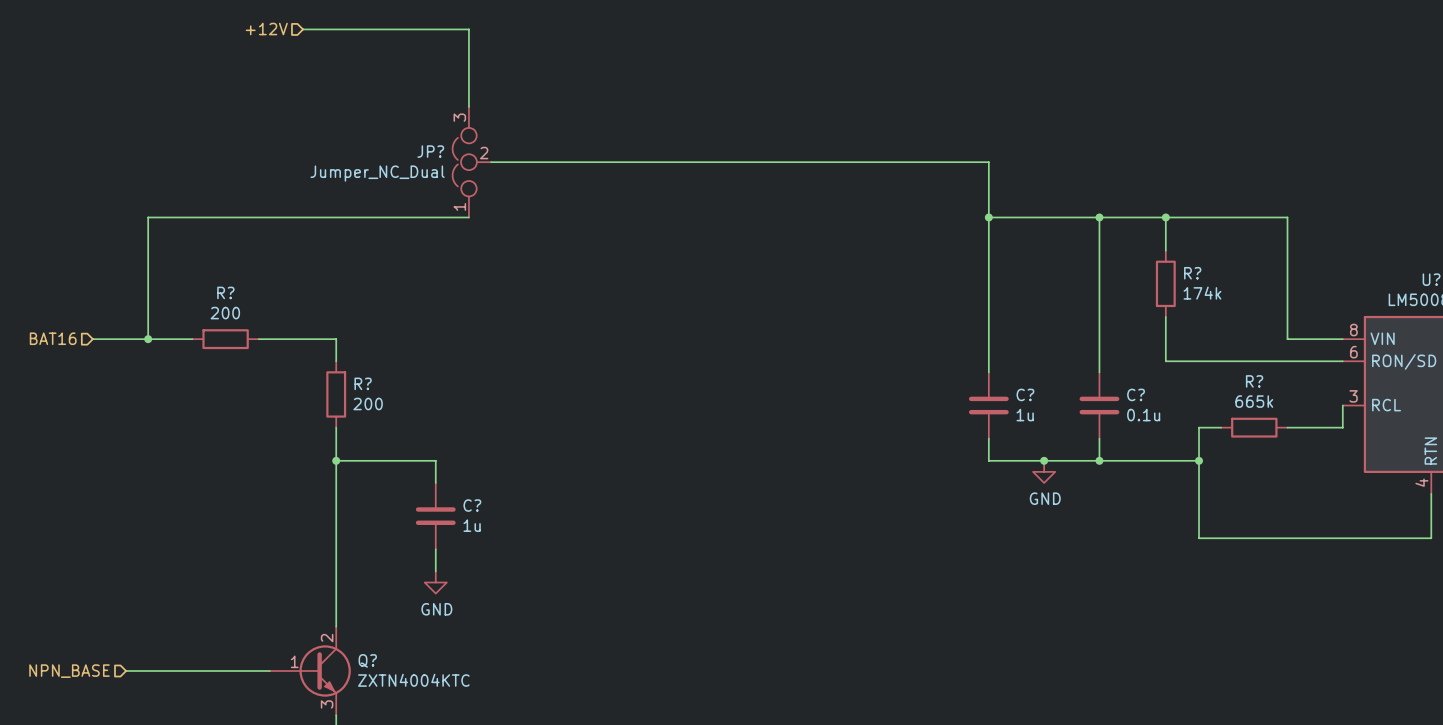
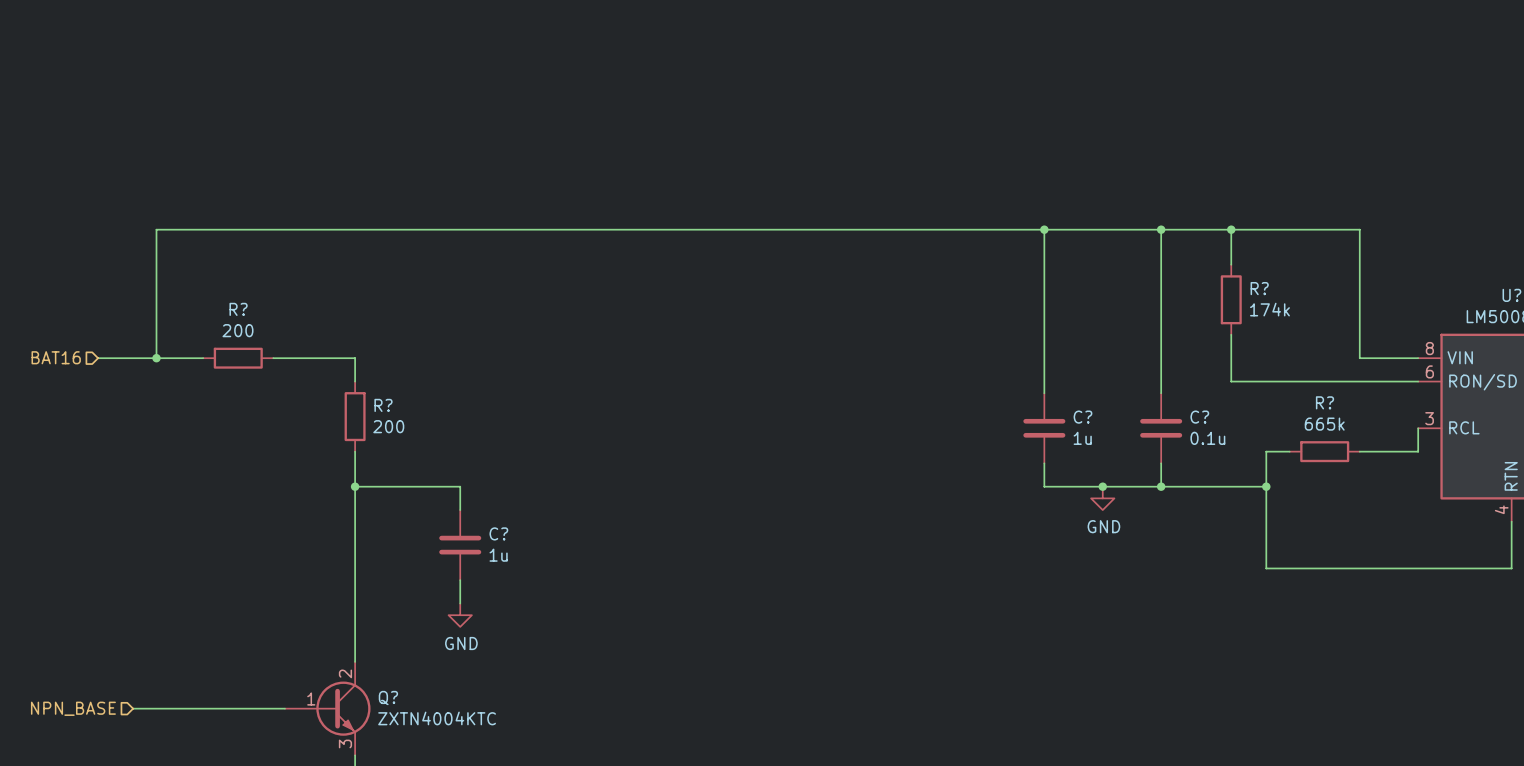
hierarchical label: +12V (266, 29) -> none
wire: (303, 29) (468, 29) (468, 106) -> none
JP?: Jumper_NC_Dual (471, 162) -> none
wire: (491, 162) (988, 162) (988, 217) -> (495, 229) (1044, 229)

